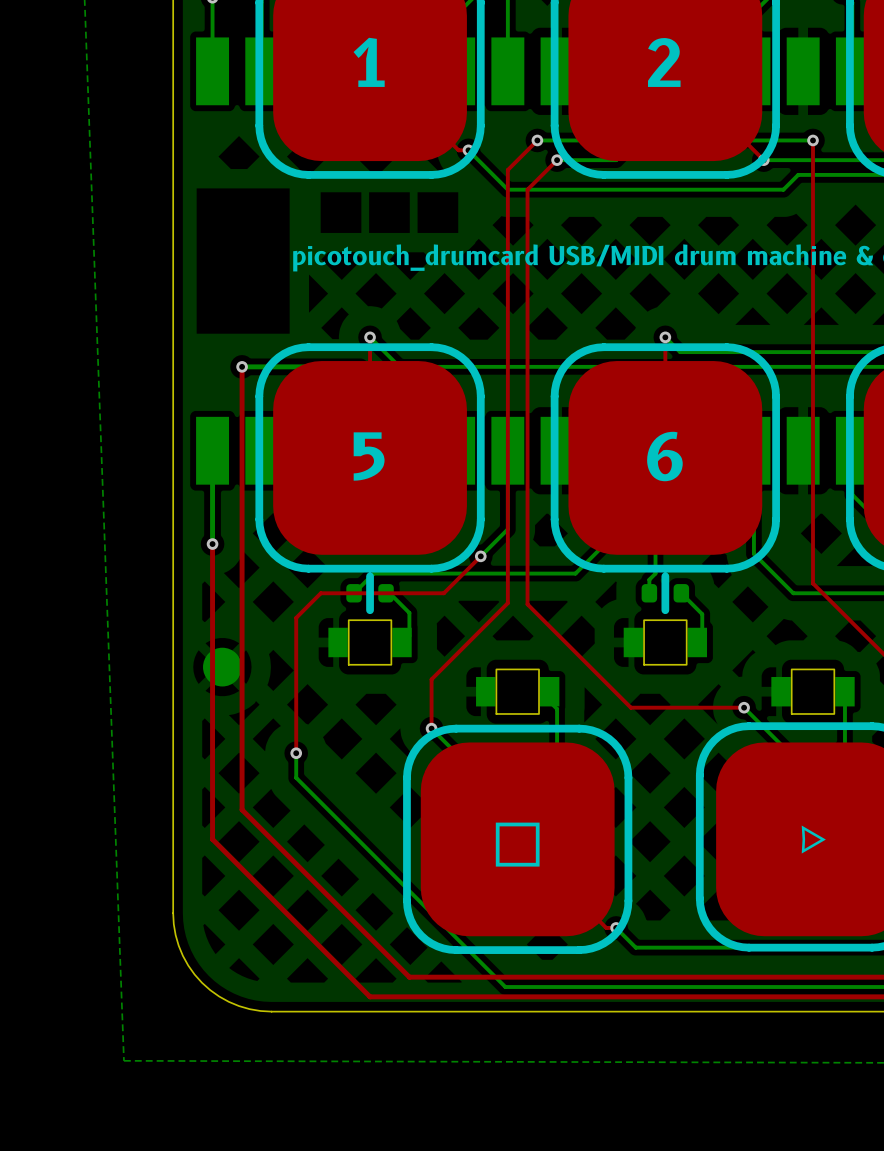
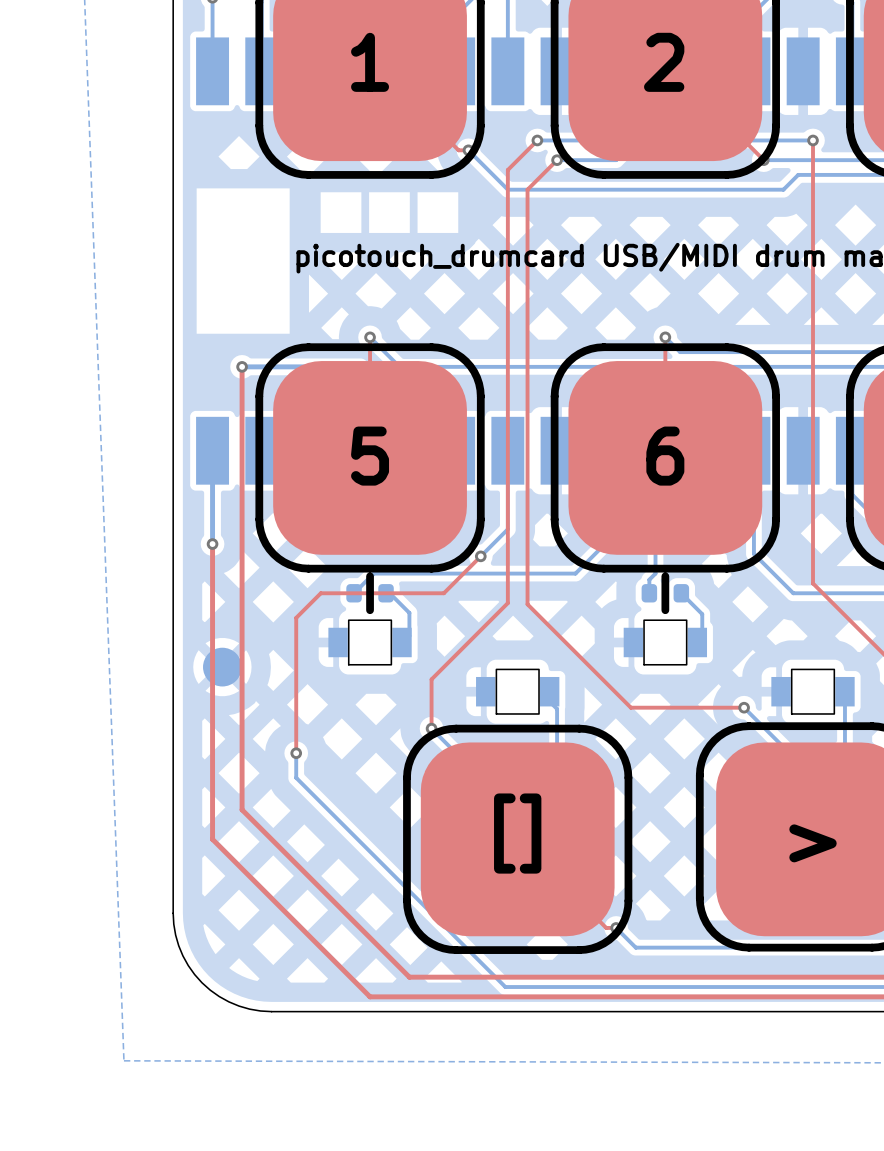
text: ▷ (813, 839) -> > (813, 843)
text: ◻︎ (517, 844) -> [] (517, 833)

